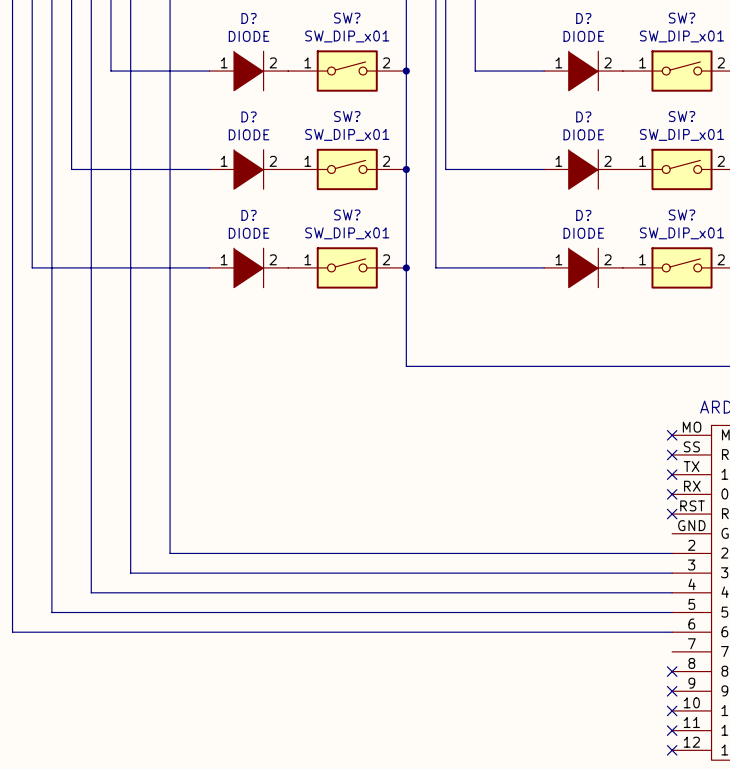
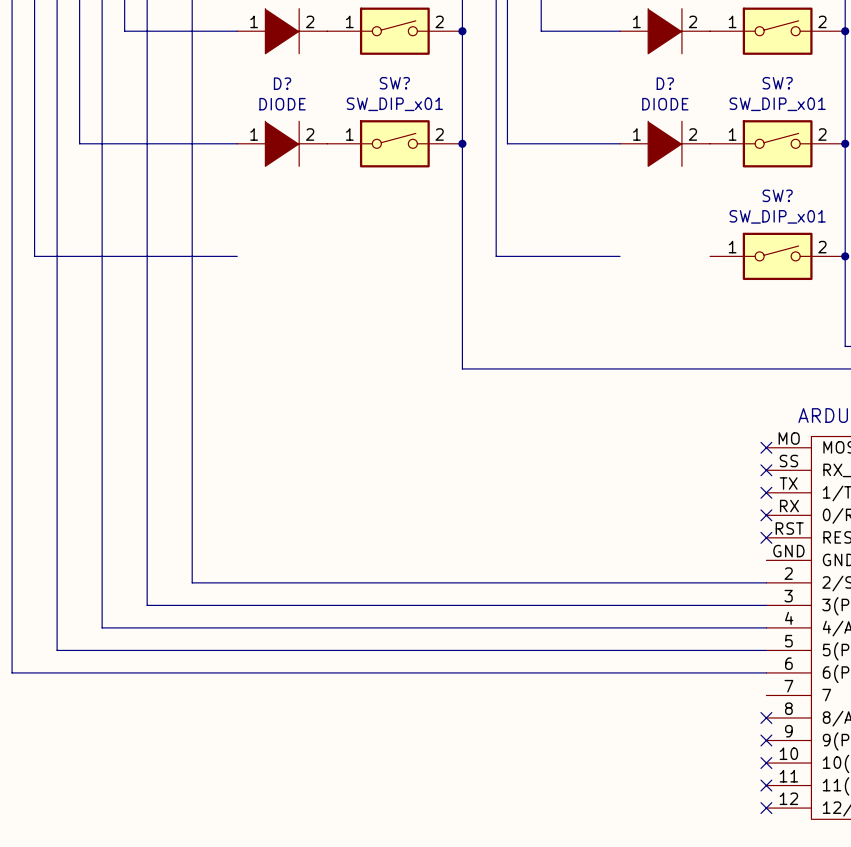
D?: DIODE (248, 267) -> none
SW?: SW_DIP_x01 (347, 267) -> none
junction: (406, 267) -> none
D?: DIODE (583, 267) -> none

